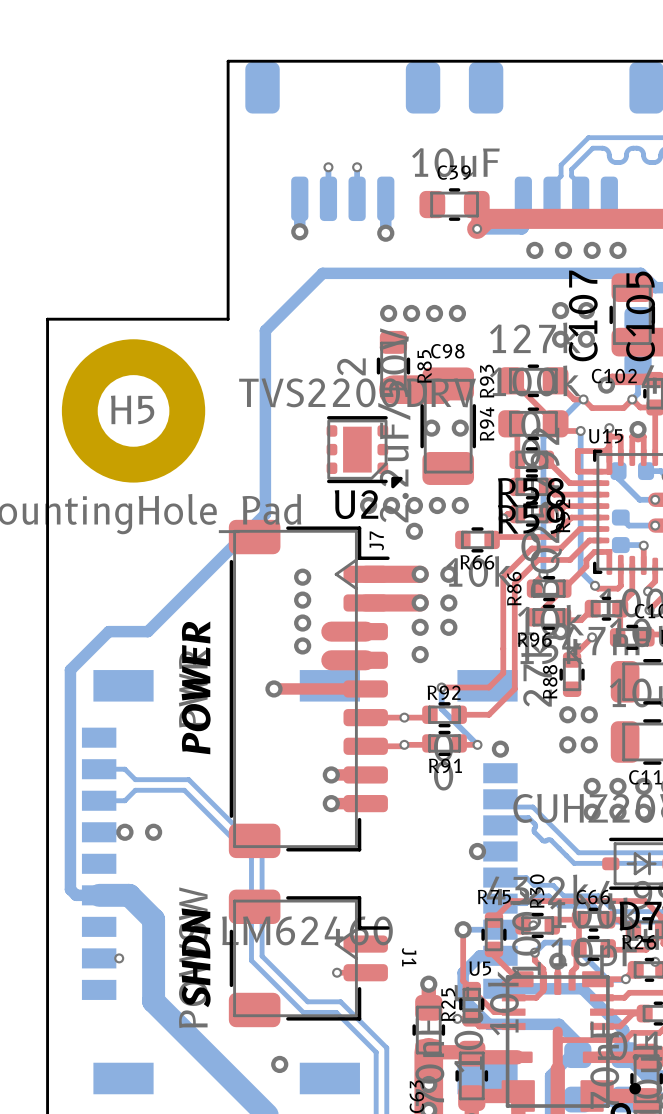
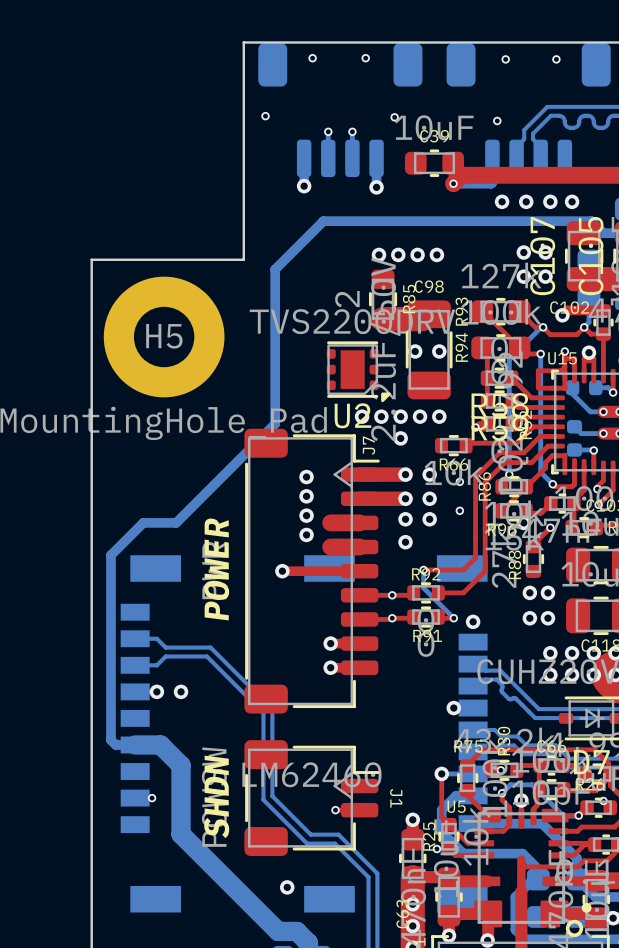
via: none -> (312, 58)
via: none -> (365, 58)
via: none -> (505, 59)
via: none -> (556, 59)
via: none -> (265, 116)
via: none -> (394, 117)
via: none -> (497, 120)
via: none -> (459, 481)
via: none -> (459, 510)

